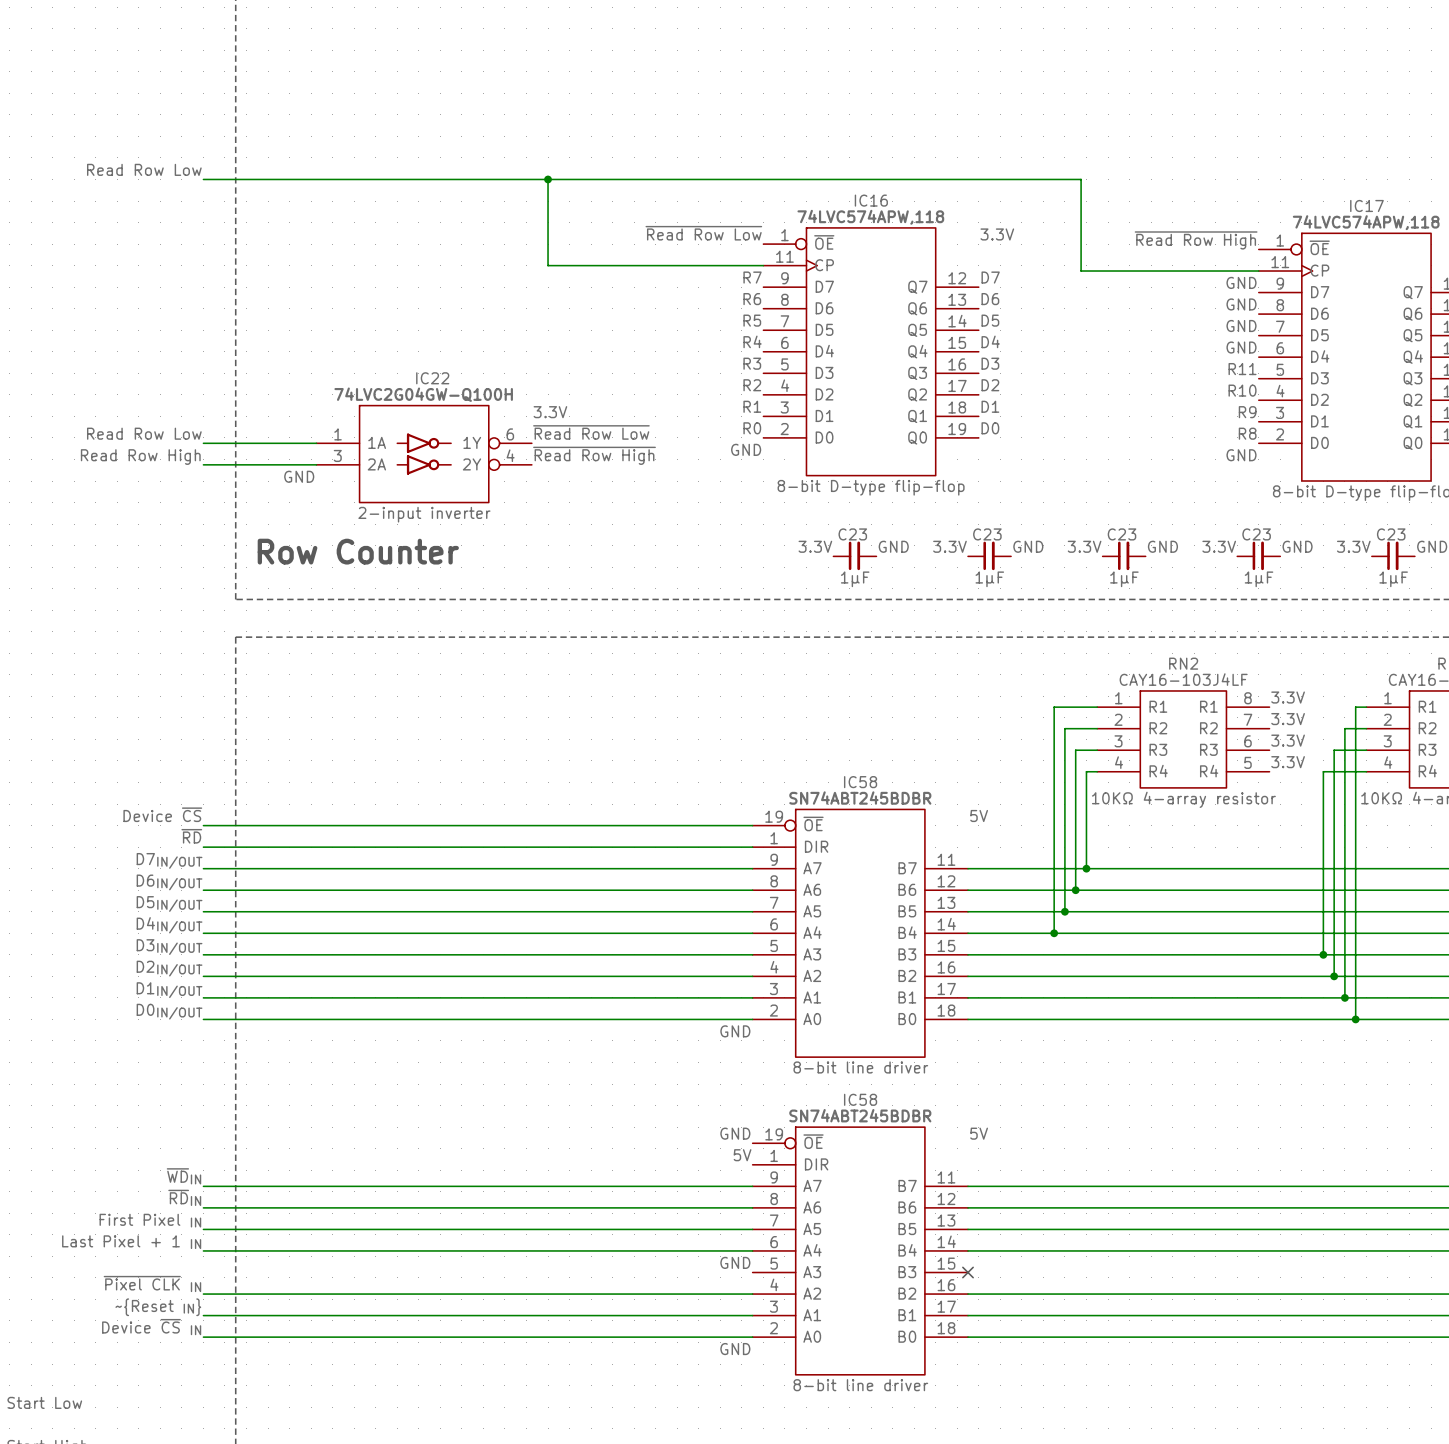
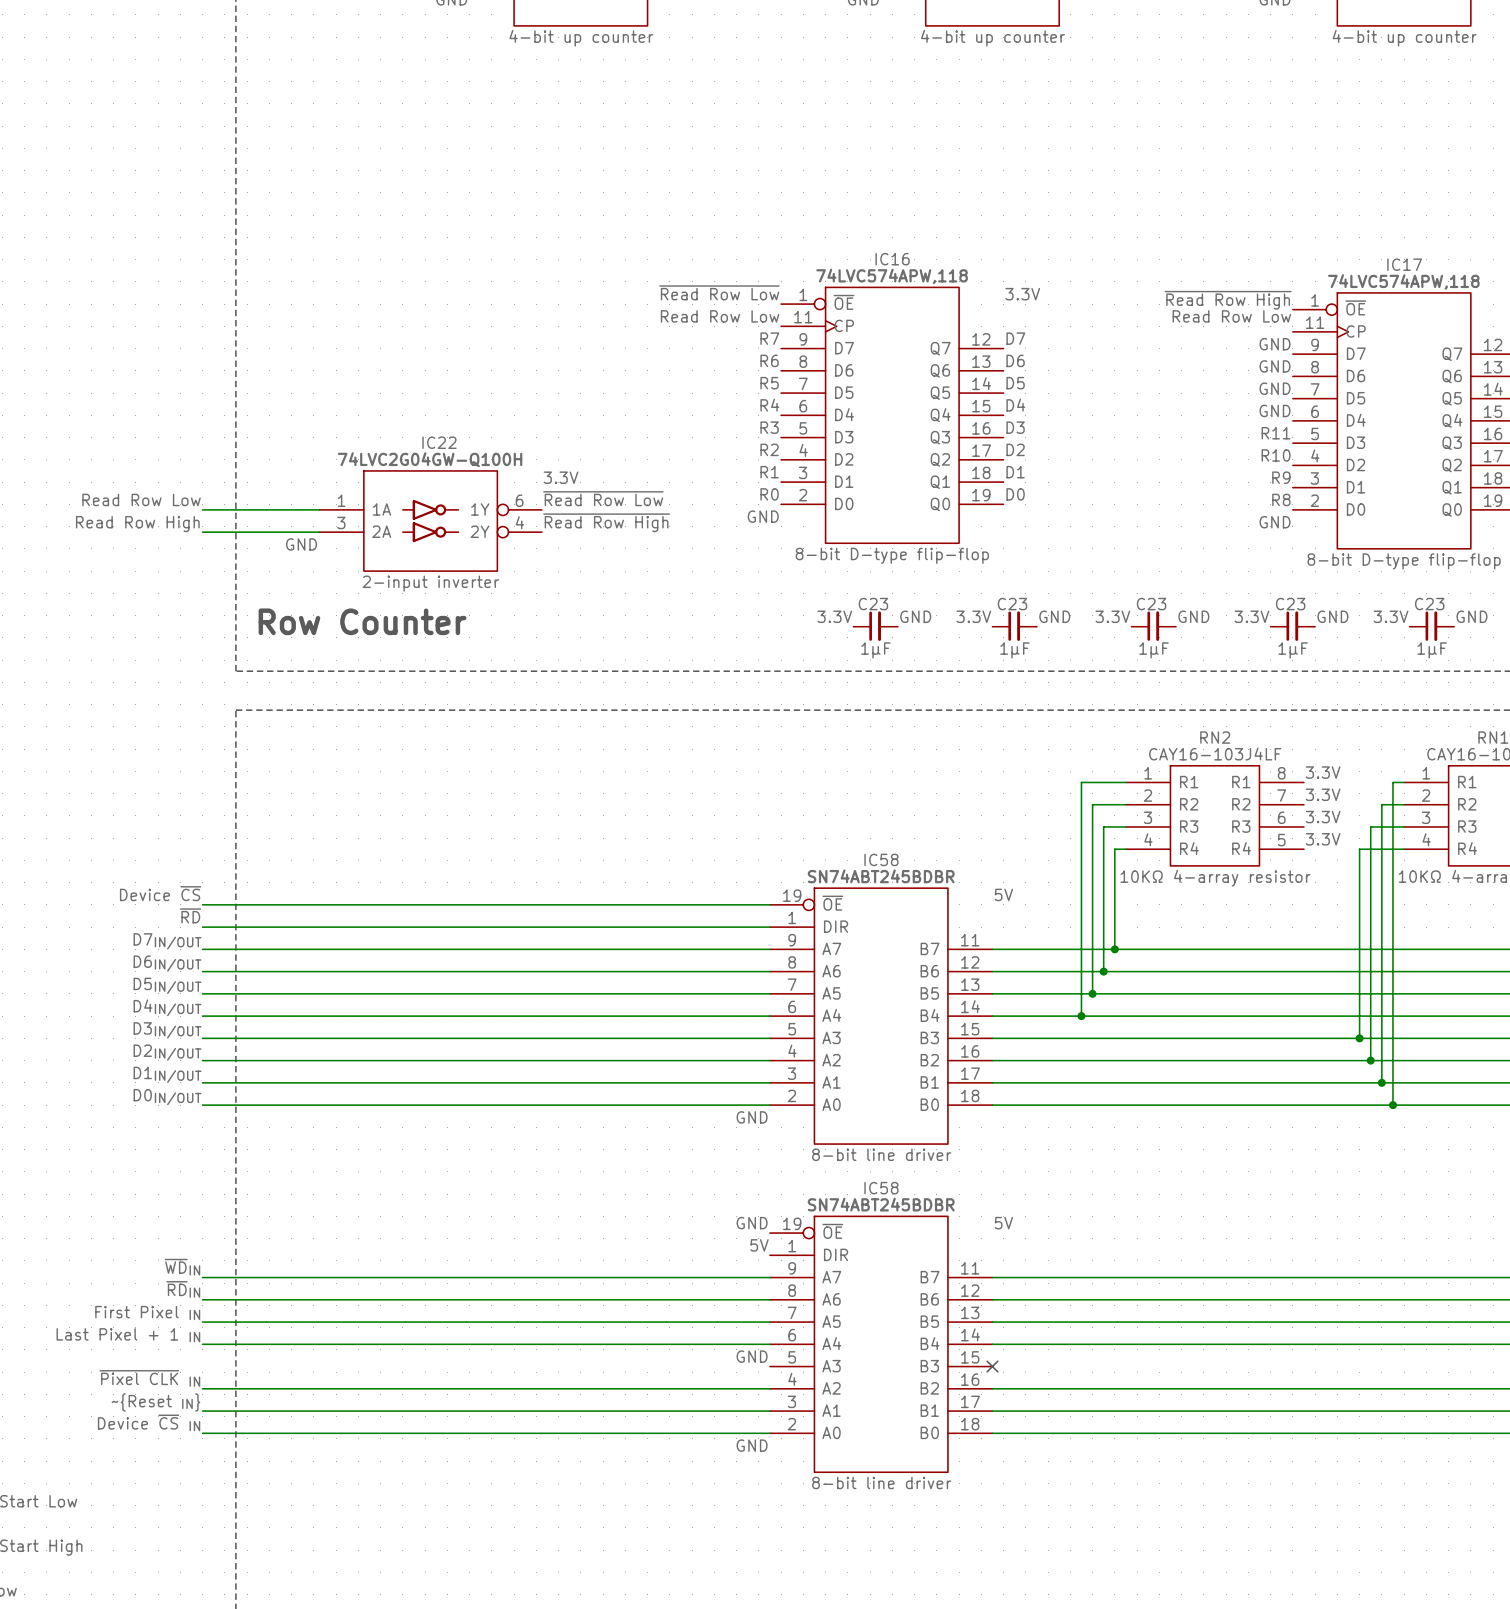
label: Read Row Low (144, 169) -> none
wire: (203, 179) (1081, 179) (1081, 271) (1258, 271) -> none
wire: (548, 179) (548, 265) (763, 265) -> none
junction: (548, 179) -> none
label: none -> Read Row Low (720, 316)
label: none -> Read Row Low (1231, 316)

